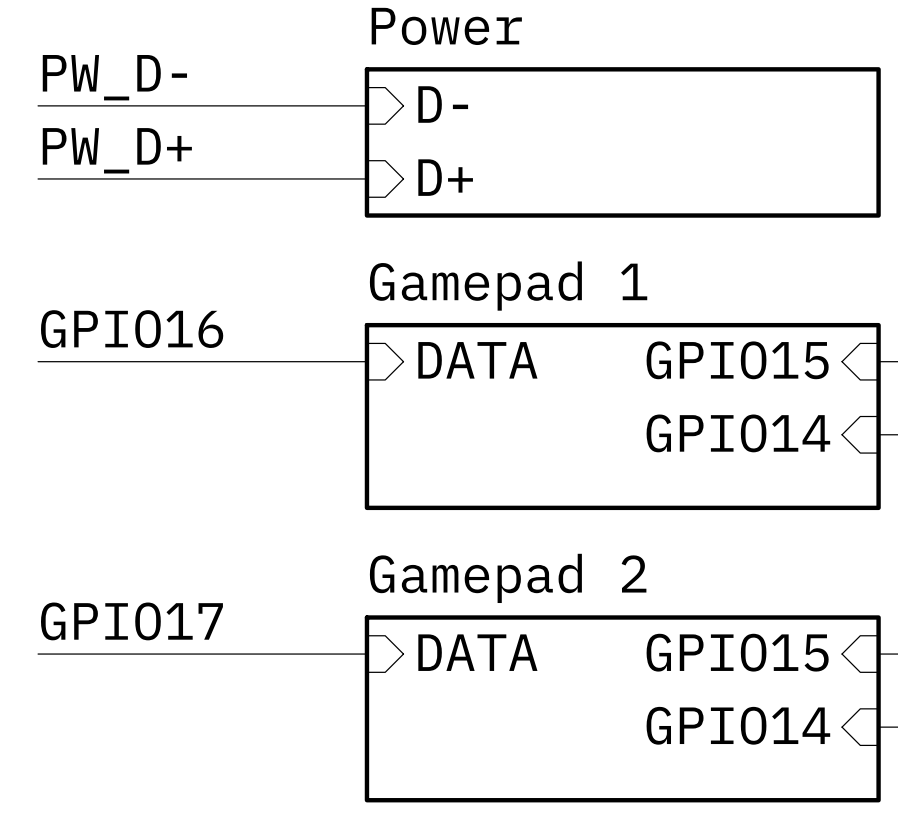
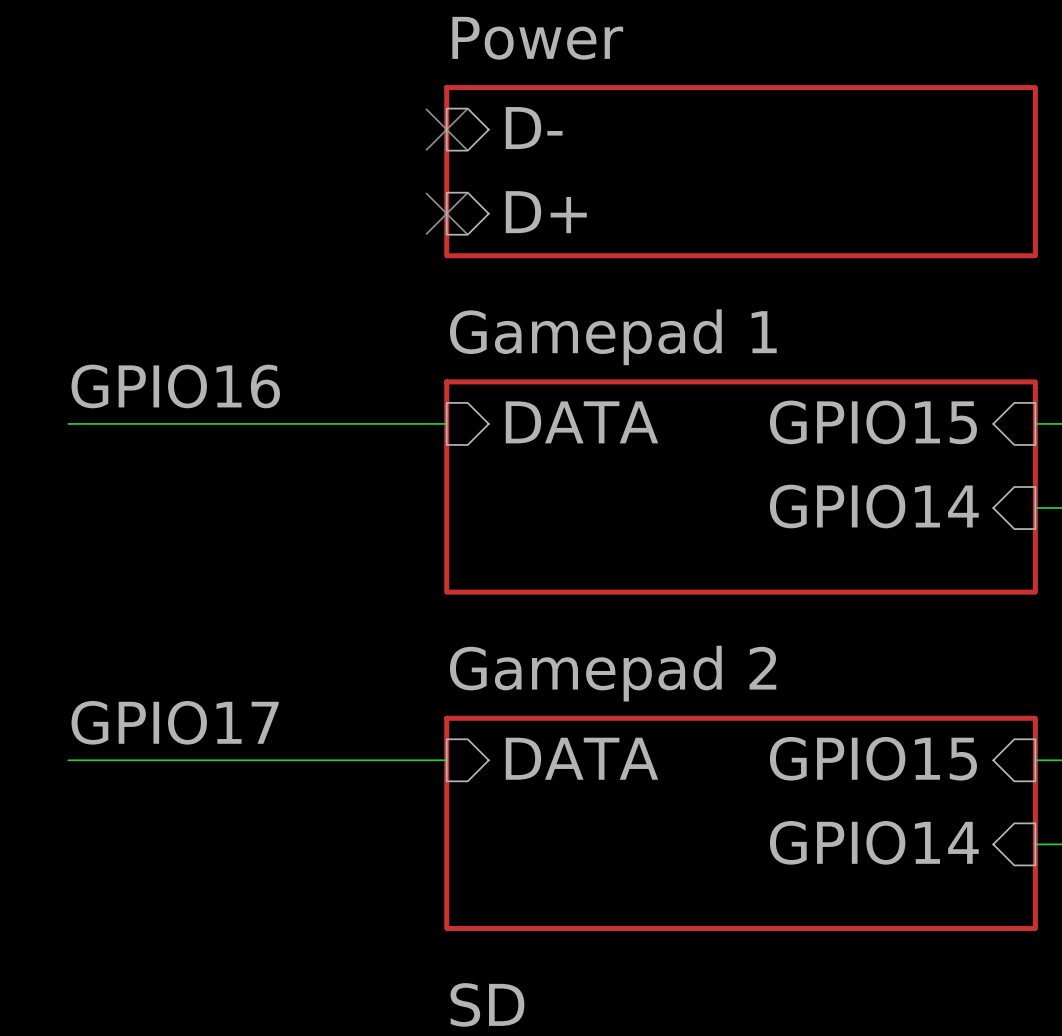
label: PW_D- (114, 77) -> none
wire: (38, 105) (366, 105) -> none
no-connect mark: none -> (446, 129)
label: PW_D+ (117, 150) -> none
wire: (38, 178) (366, 178) -> none
no-connect mark: none -> (446, 213)

